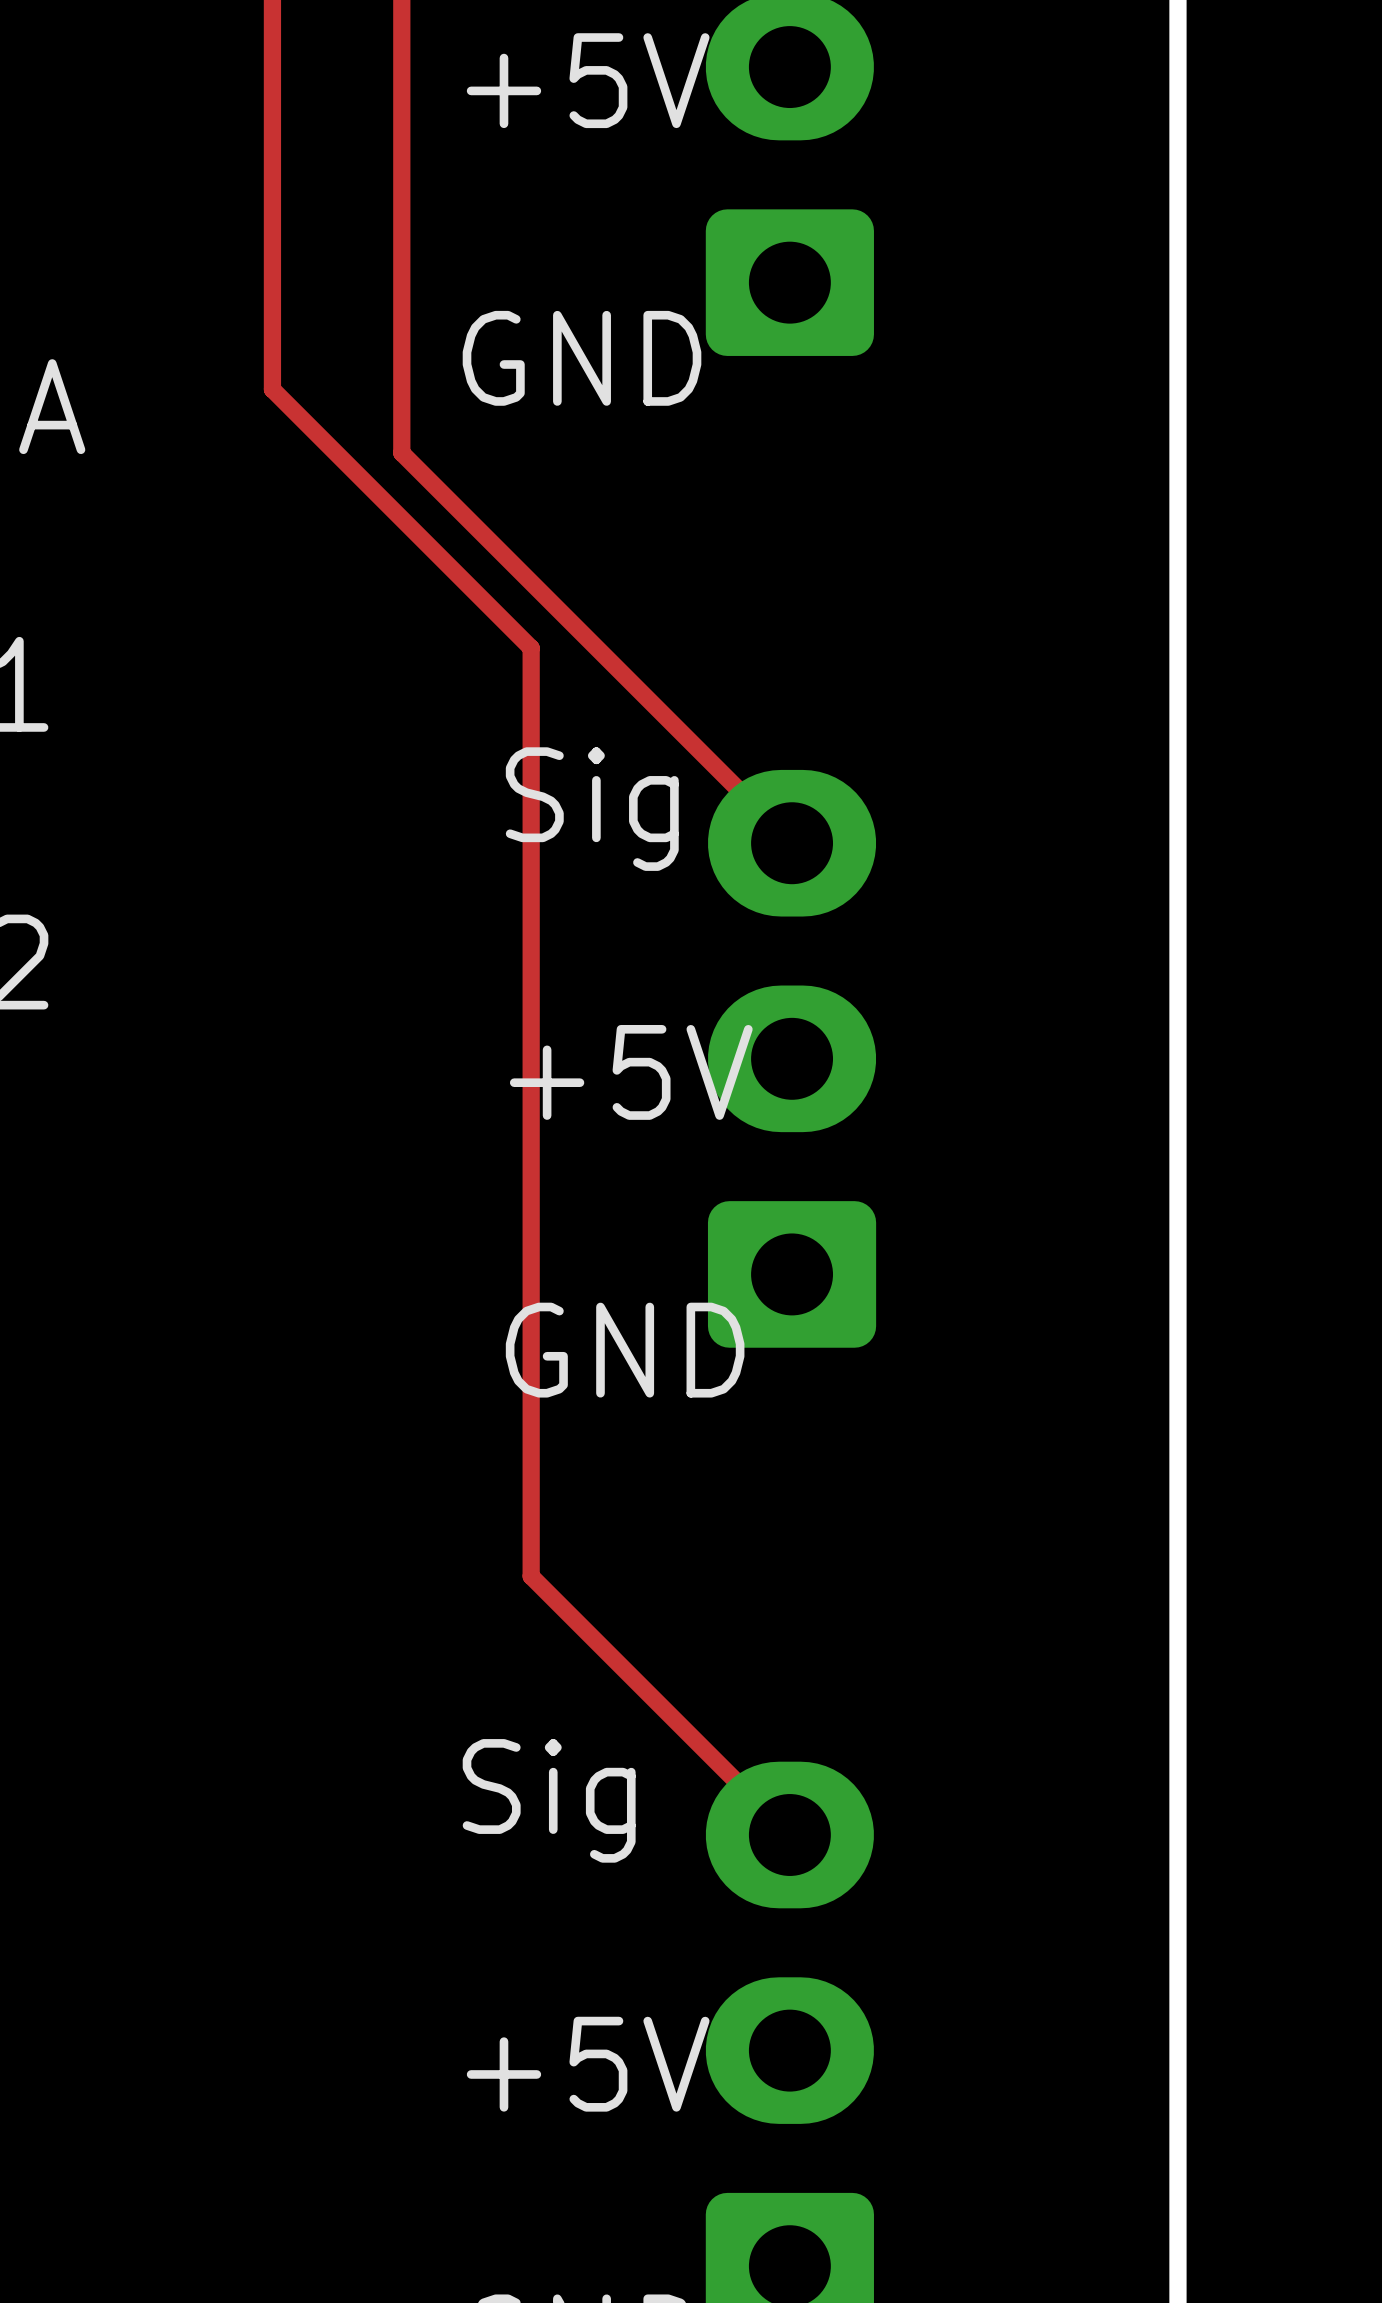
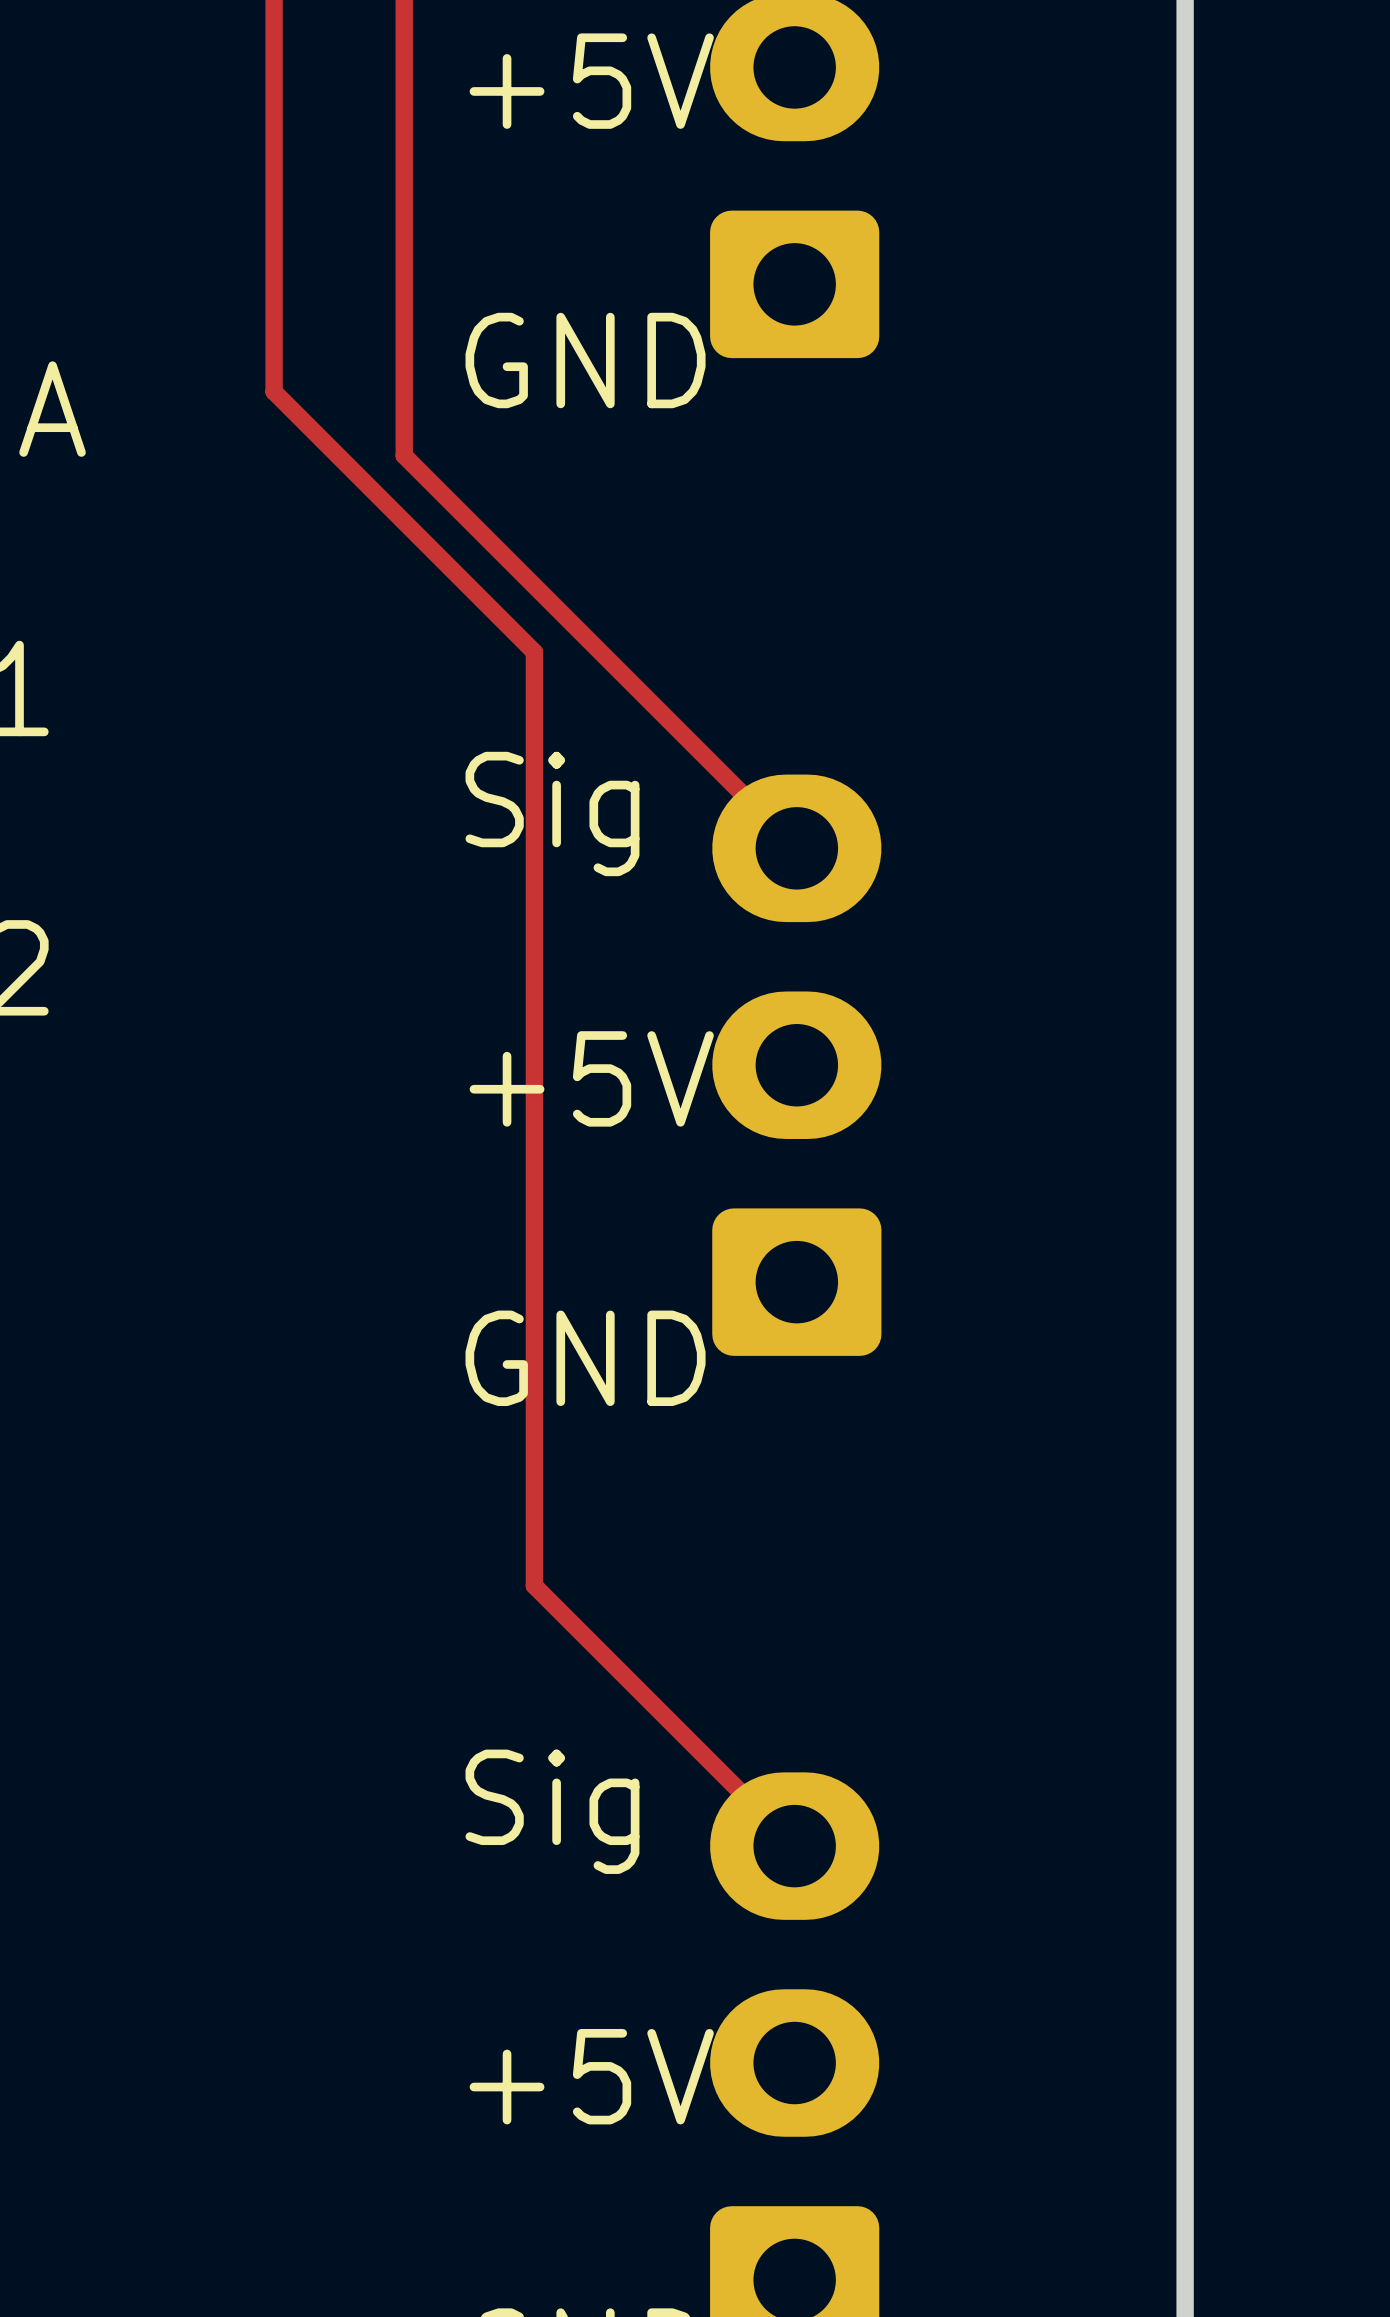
text position: Sig (592, 809) -> Sig (552, 813)
text position: +5V (631, 1072) -> +5V (591, 1078)
text position: GND (625, 1350) -> GND (585, 1358)

